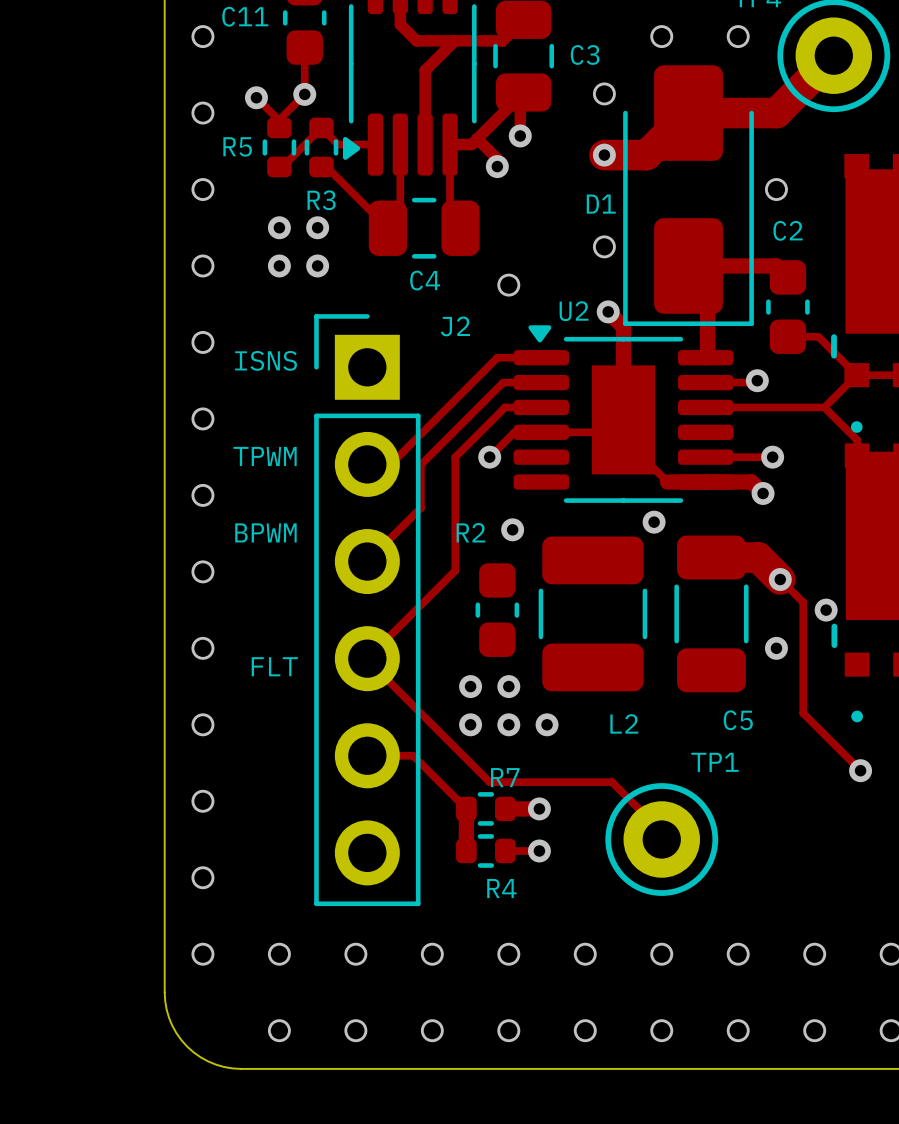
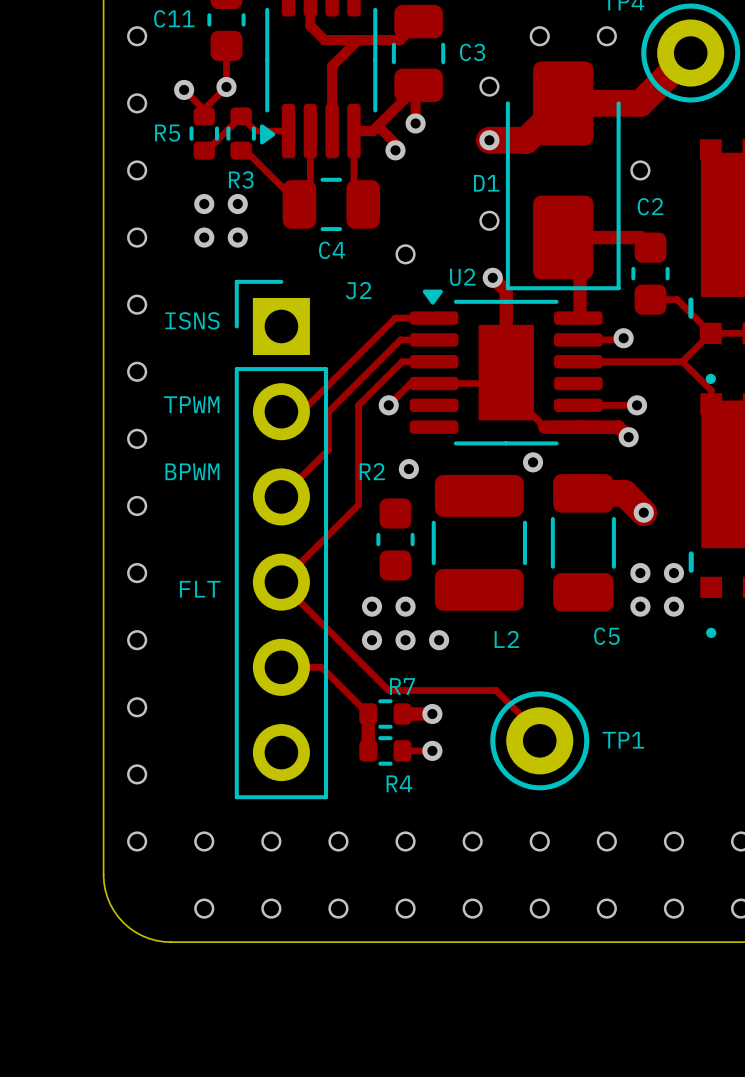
track: (780, 579) (803, 602) (803, 713) (860, 770) -> none
via: (826, 610) -> none
via: none -> (673, 573)
via: none -> (640, 606)
via: none -> (673, 606)
TP1 name position: TP1 (714, 762) -> TP1 (623, 740)
via: (860, 770) -> none

